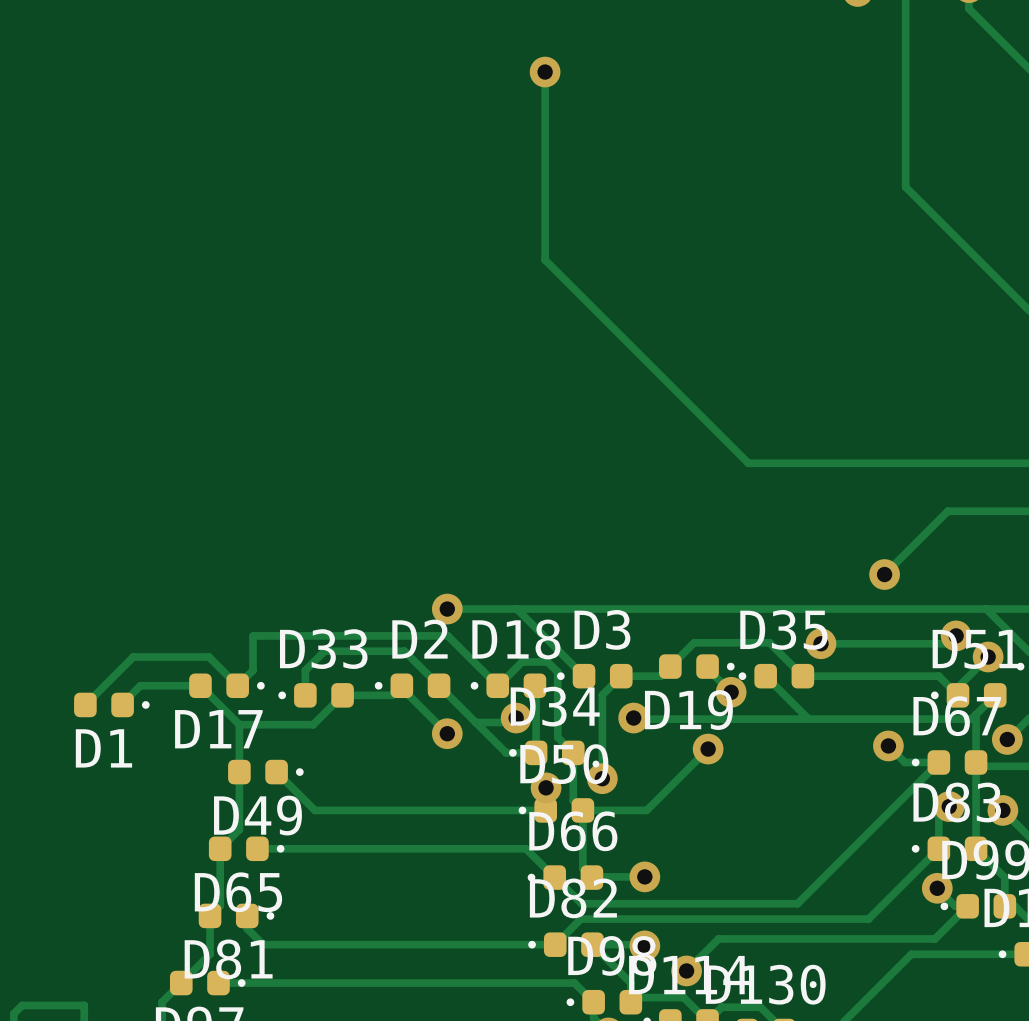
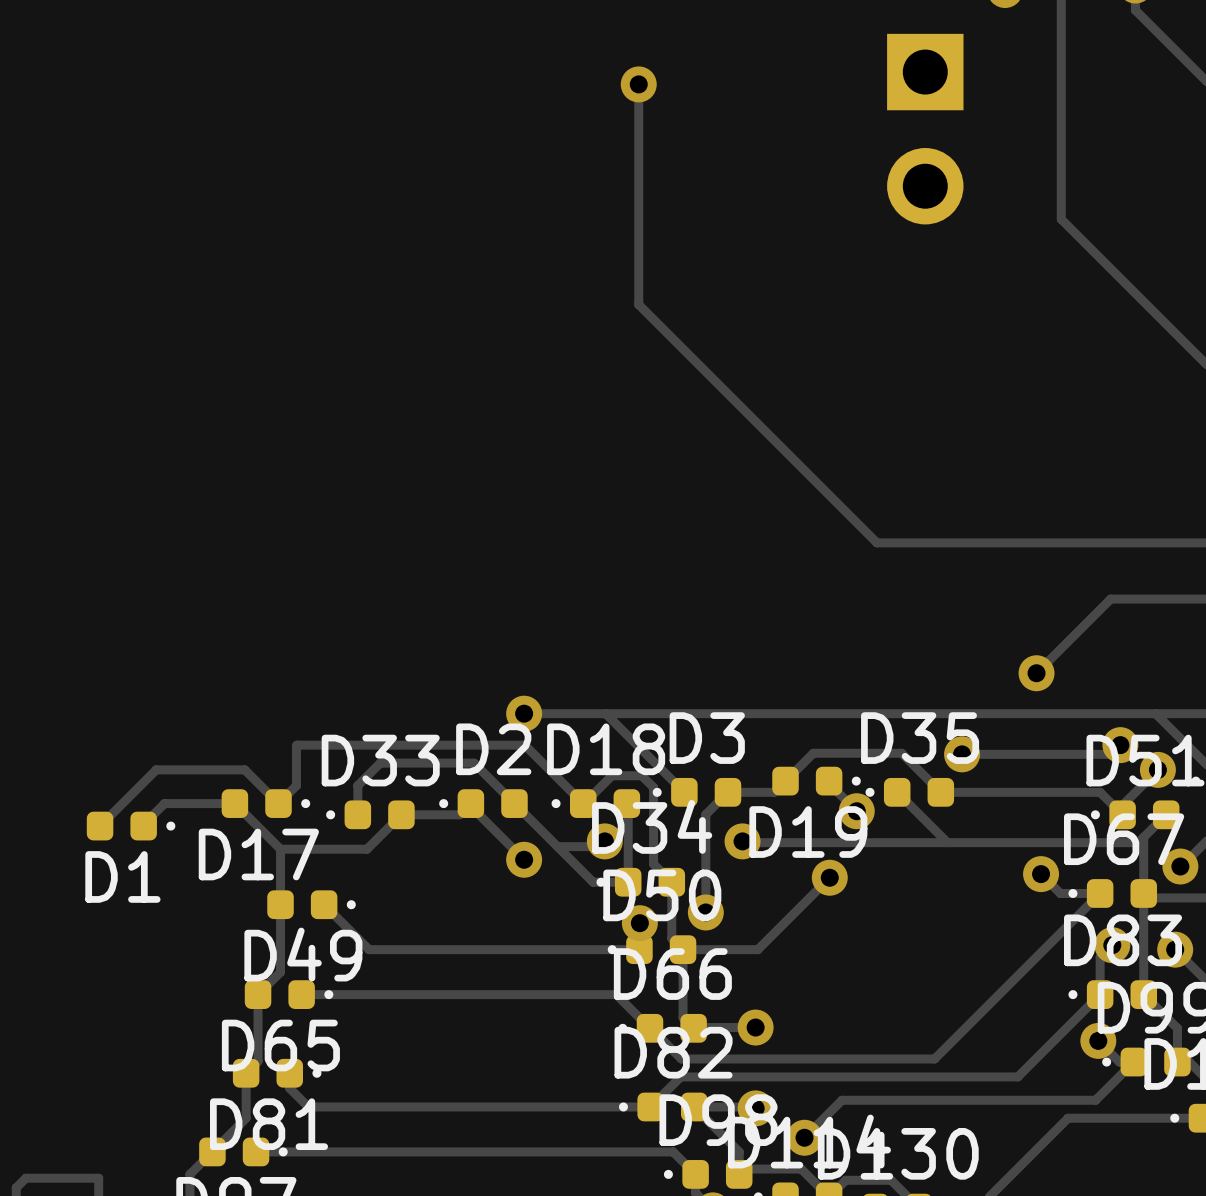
part: none -> (925, 129)

